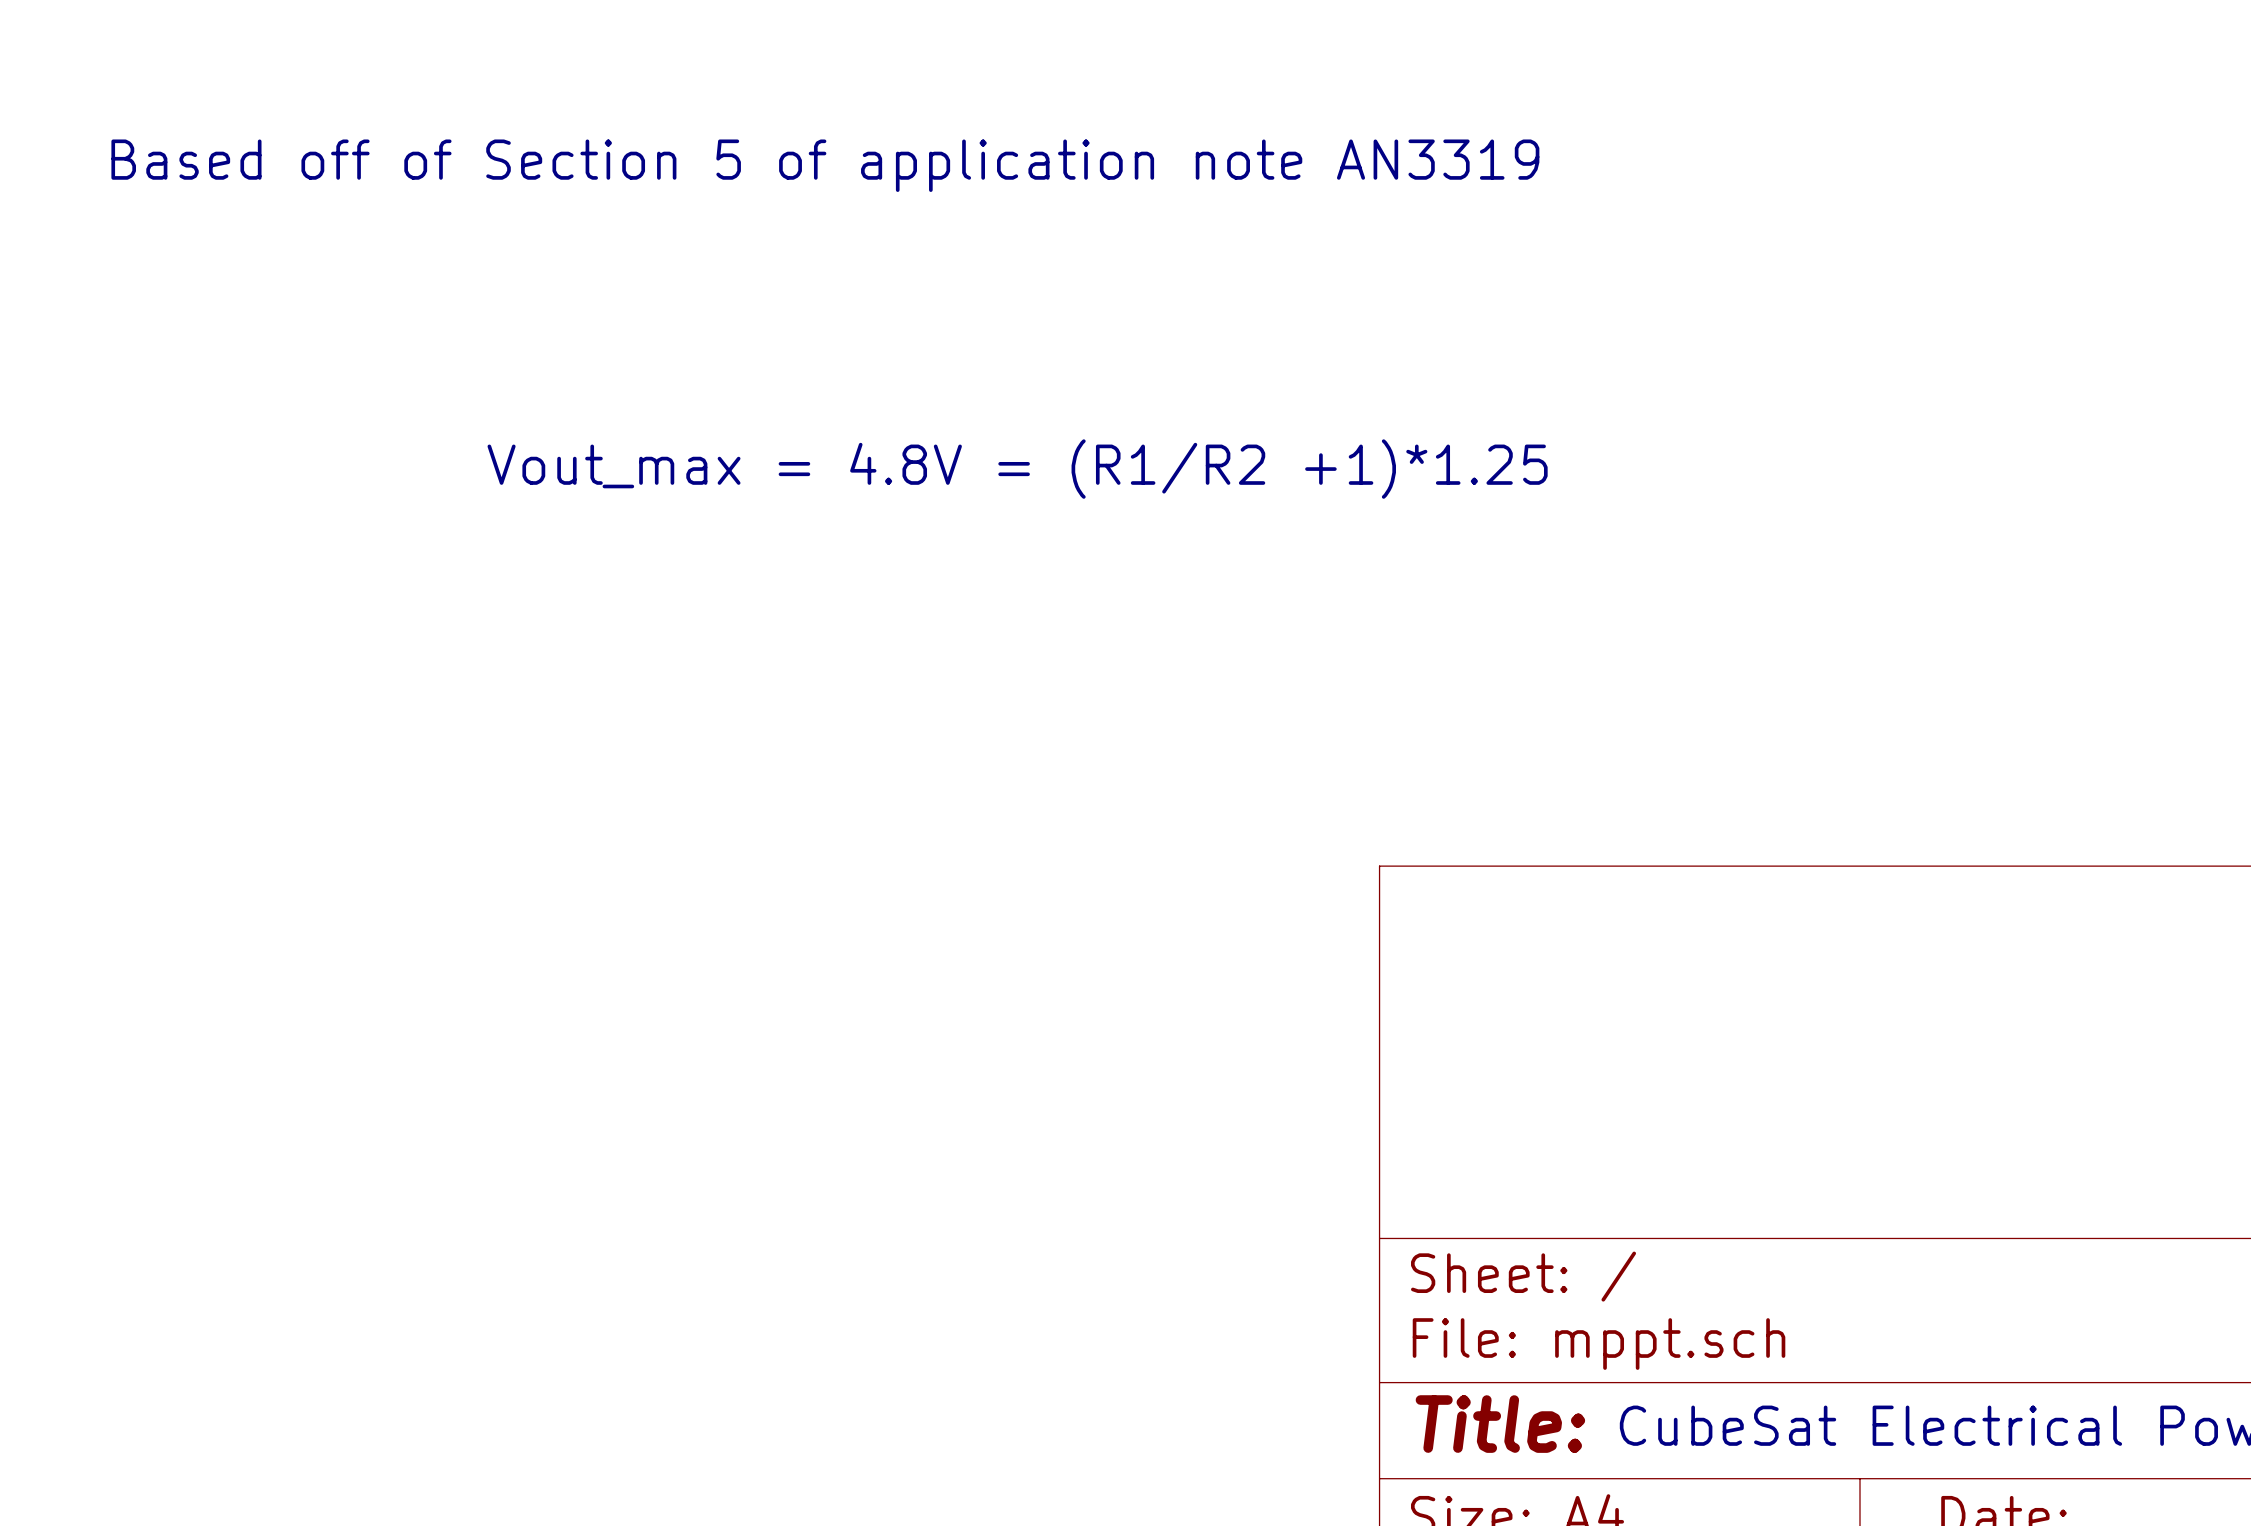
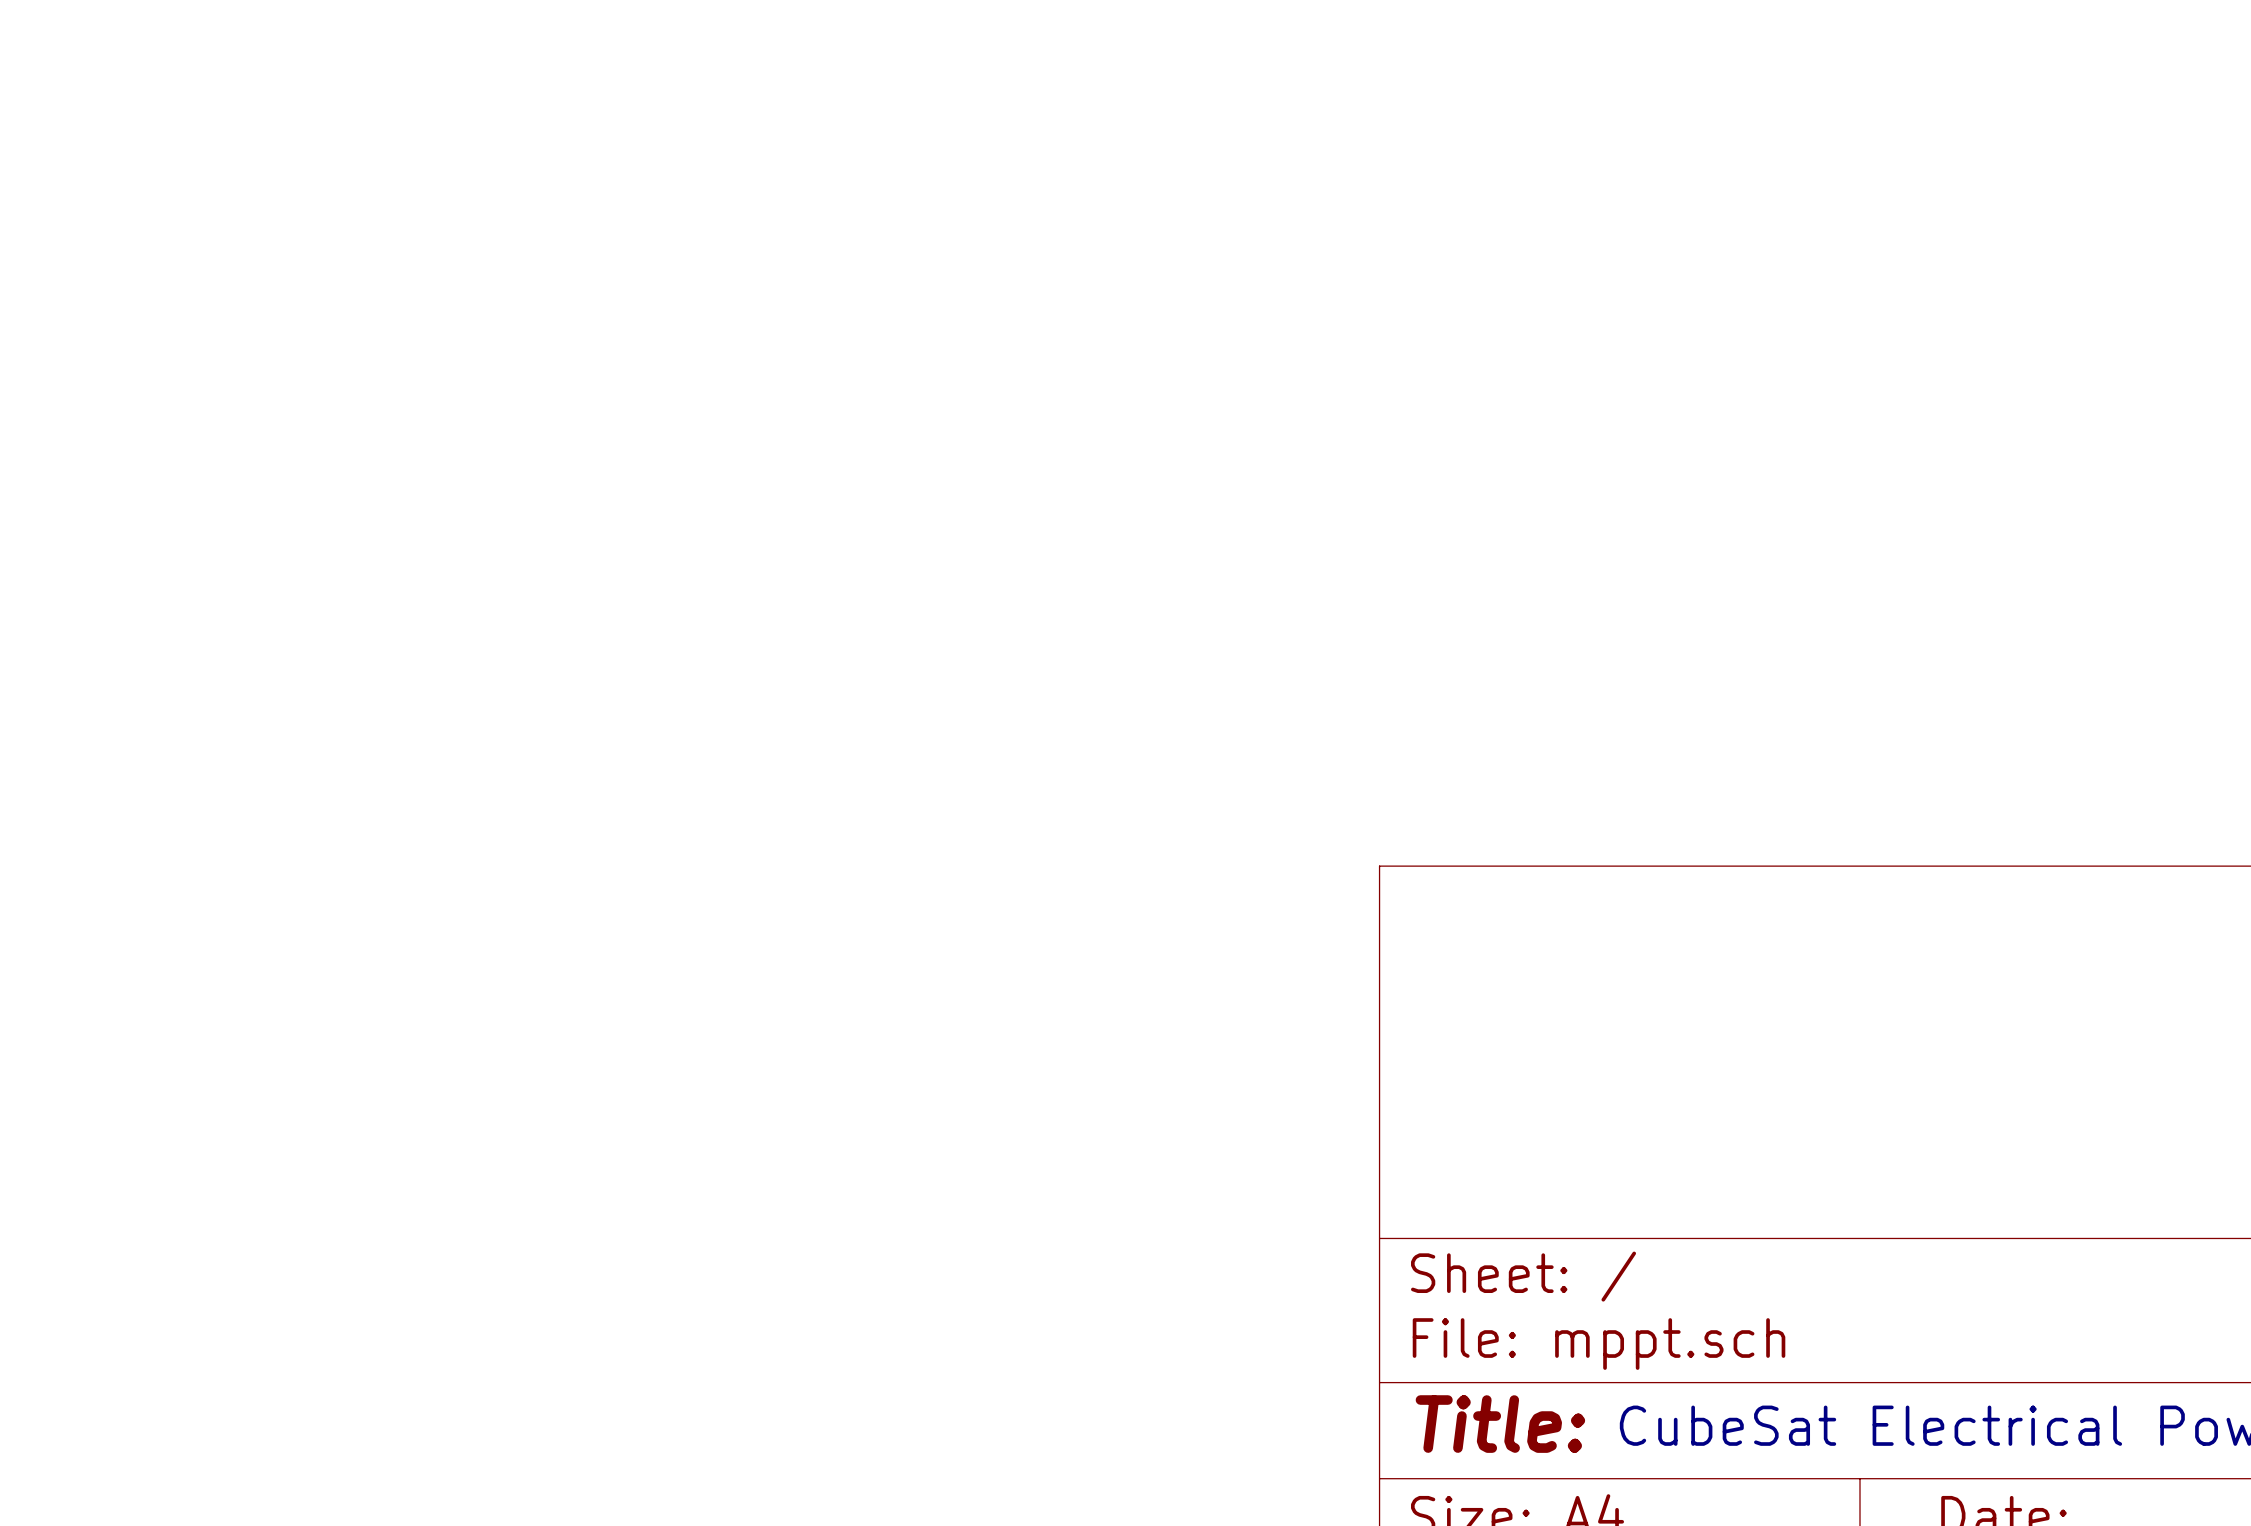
text: Based off of Section 5 of application note AN3319 (825, 165) -> none
text: Vout_max = 4.8V = (R1/R2 +1)*1.25 (1017, 469) -> none

